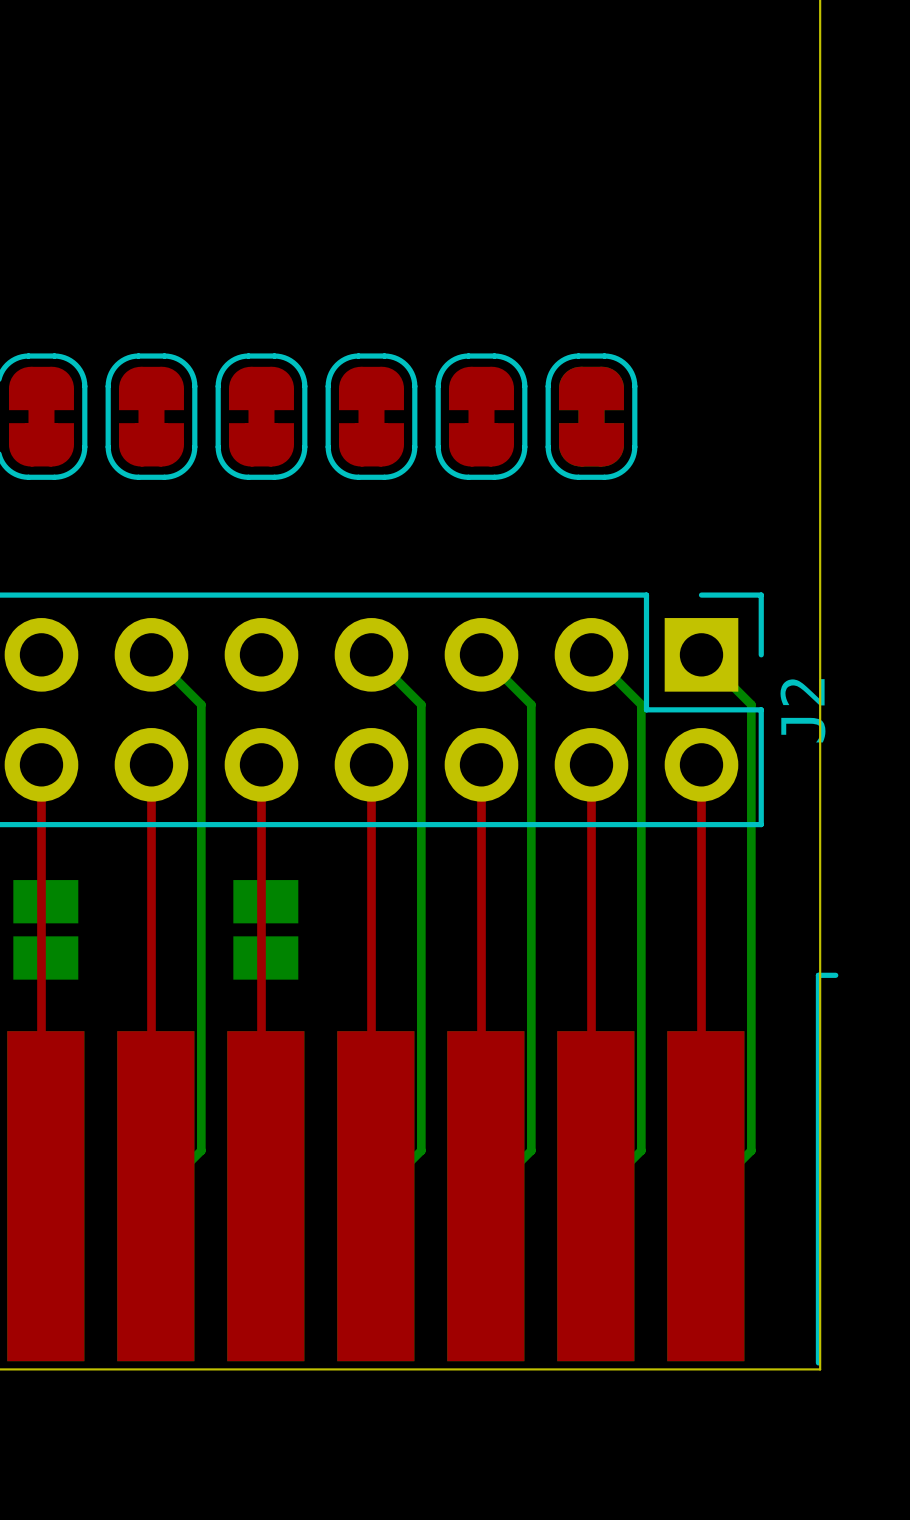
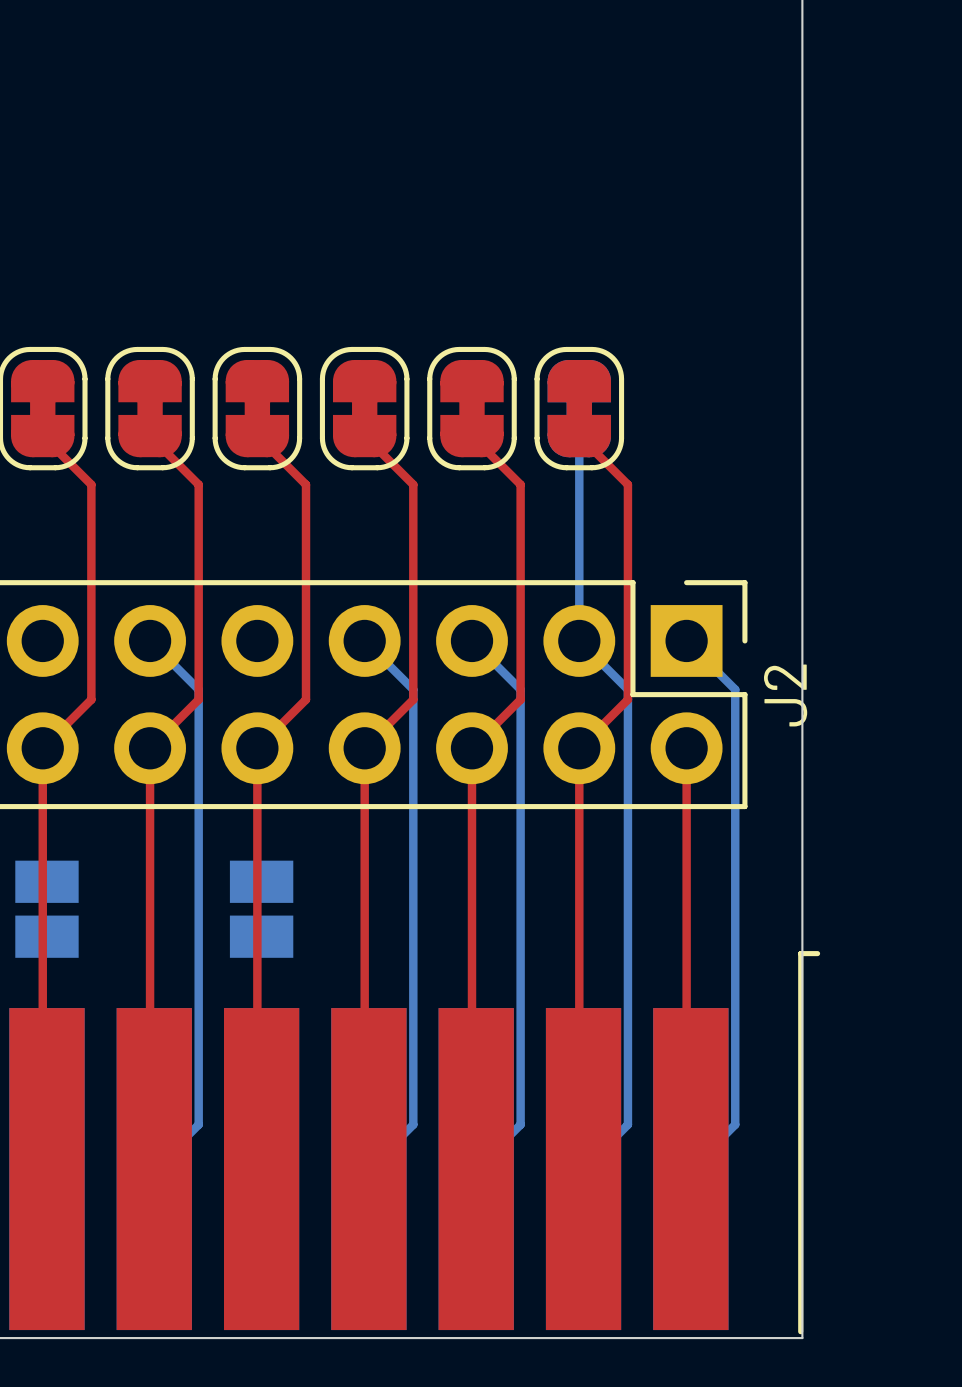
top track: none -> (42, 436) (91, 484) (91, 699) (42, 748)
top track: none -> (150, 436) (198, 484) (198, 699) (150, 748)
top track: none -> (257, 436) (306, 484) (306, 699) (257, 748)
top track: none -> (364, 436) (413, 484) (413, 699) (364, 748)
top track: none -> (472, 436) (520, 484) (520, 699) (472, 748)
bottom track: none -> (579, 436) (579, 640)
top track: none -> (579, 436) (627, 484) (627, 699) (579, 748)

